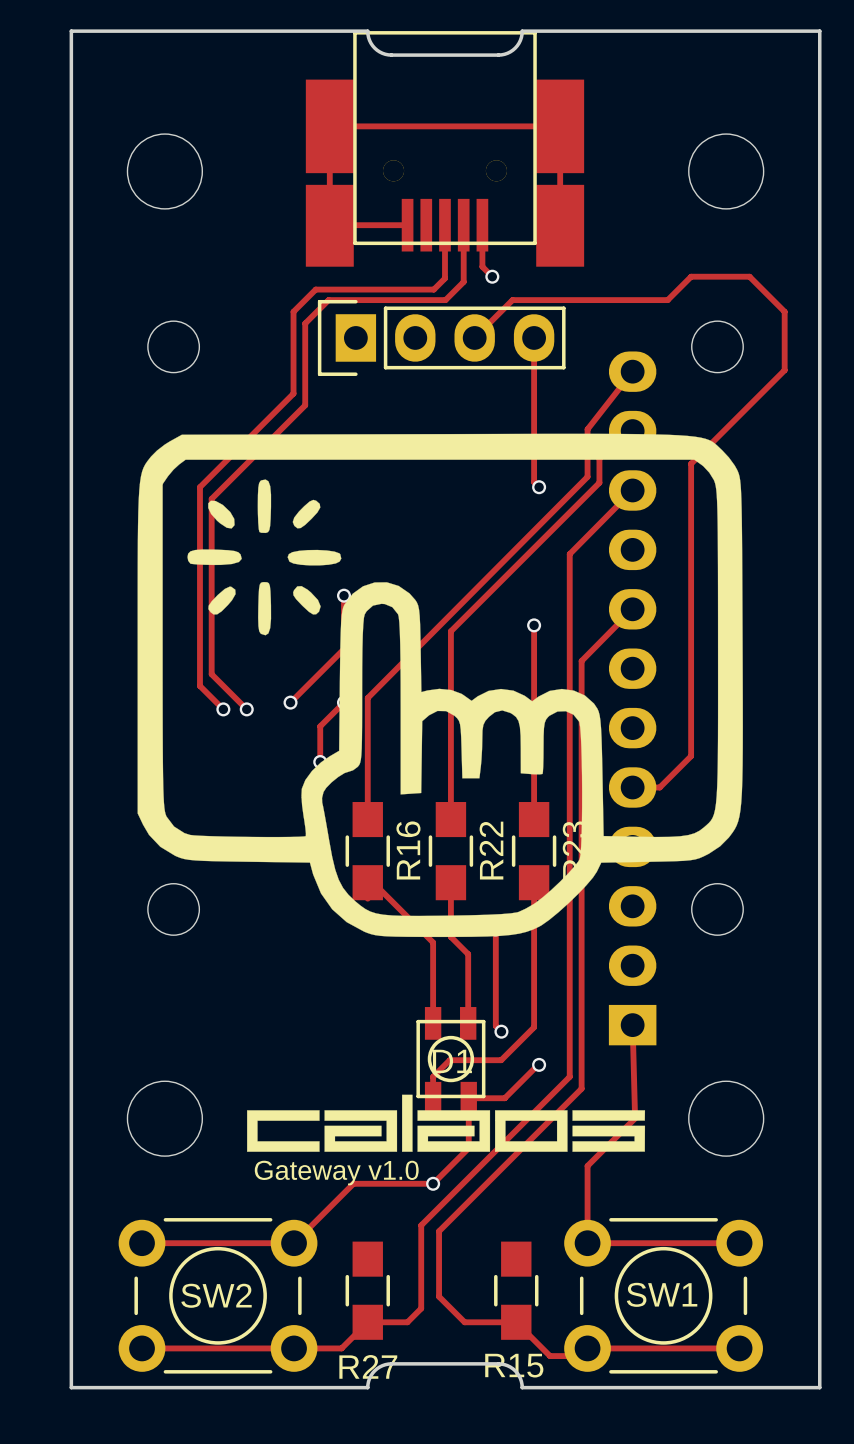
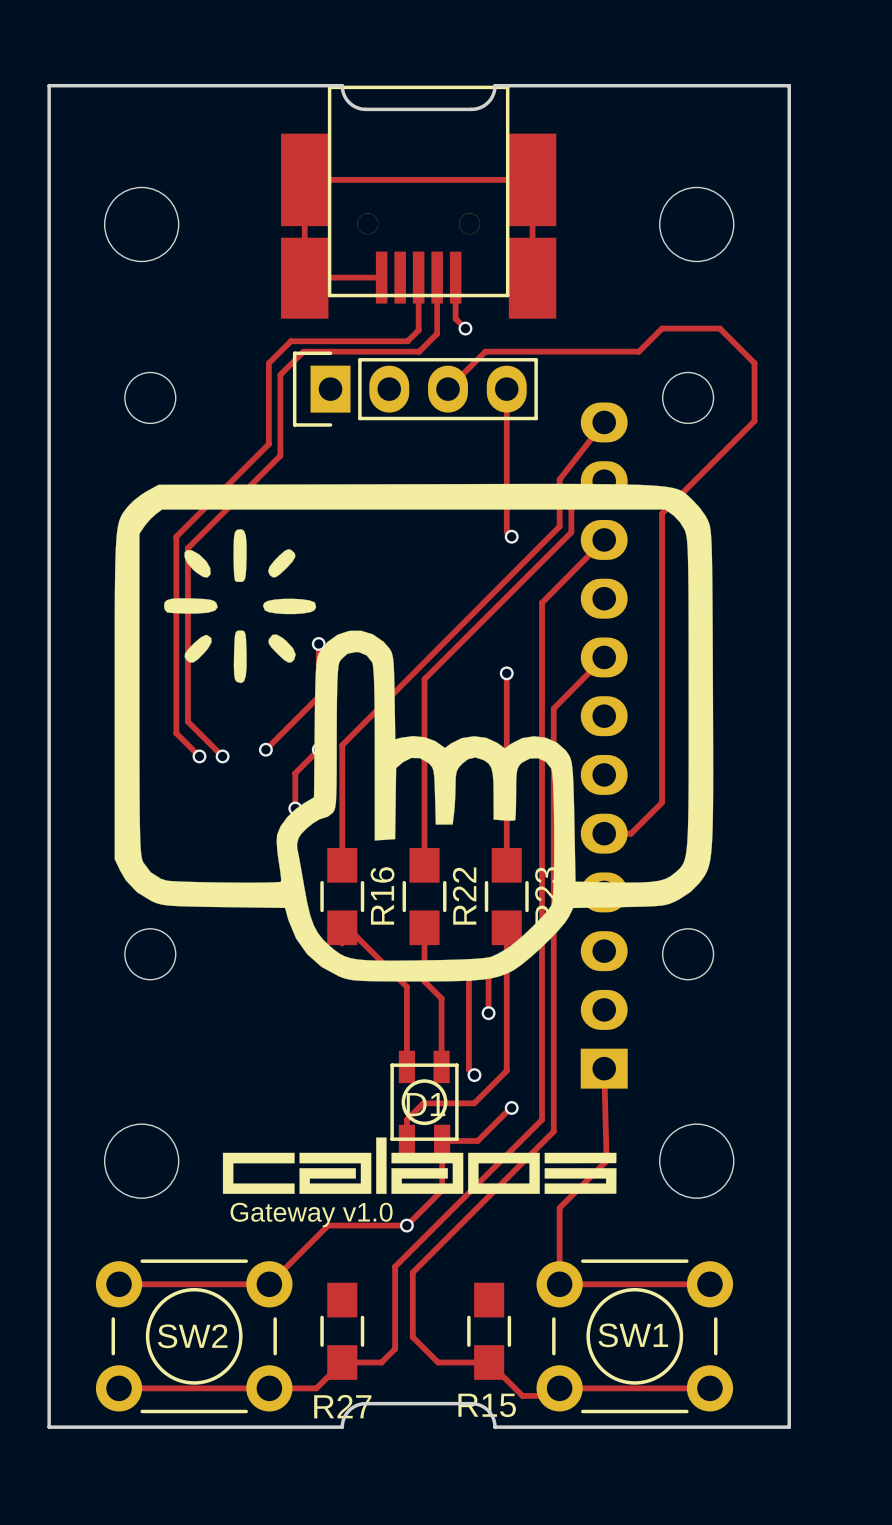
track: none -> (489, 965) (488, 1013)
via: none -> (488, 1013)

